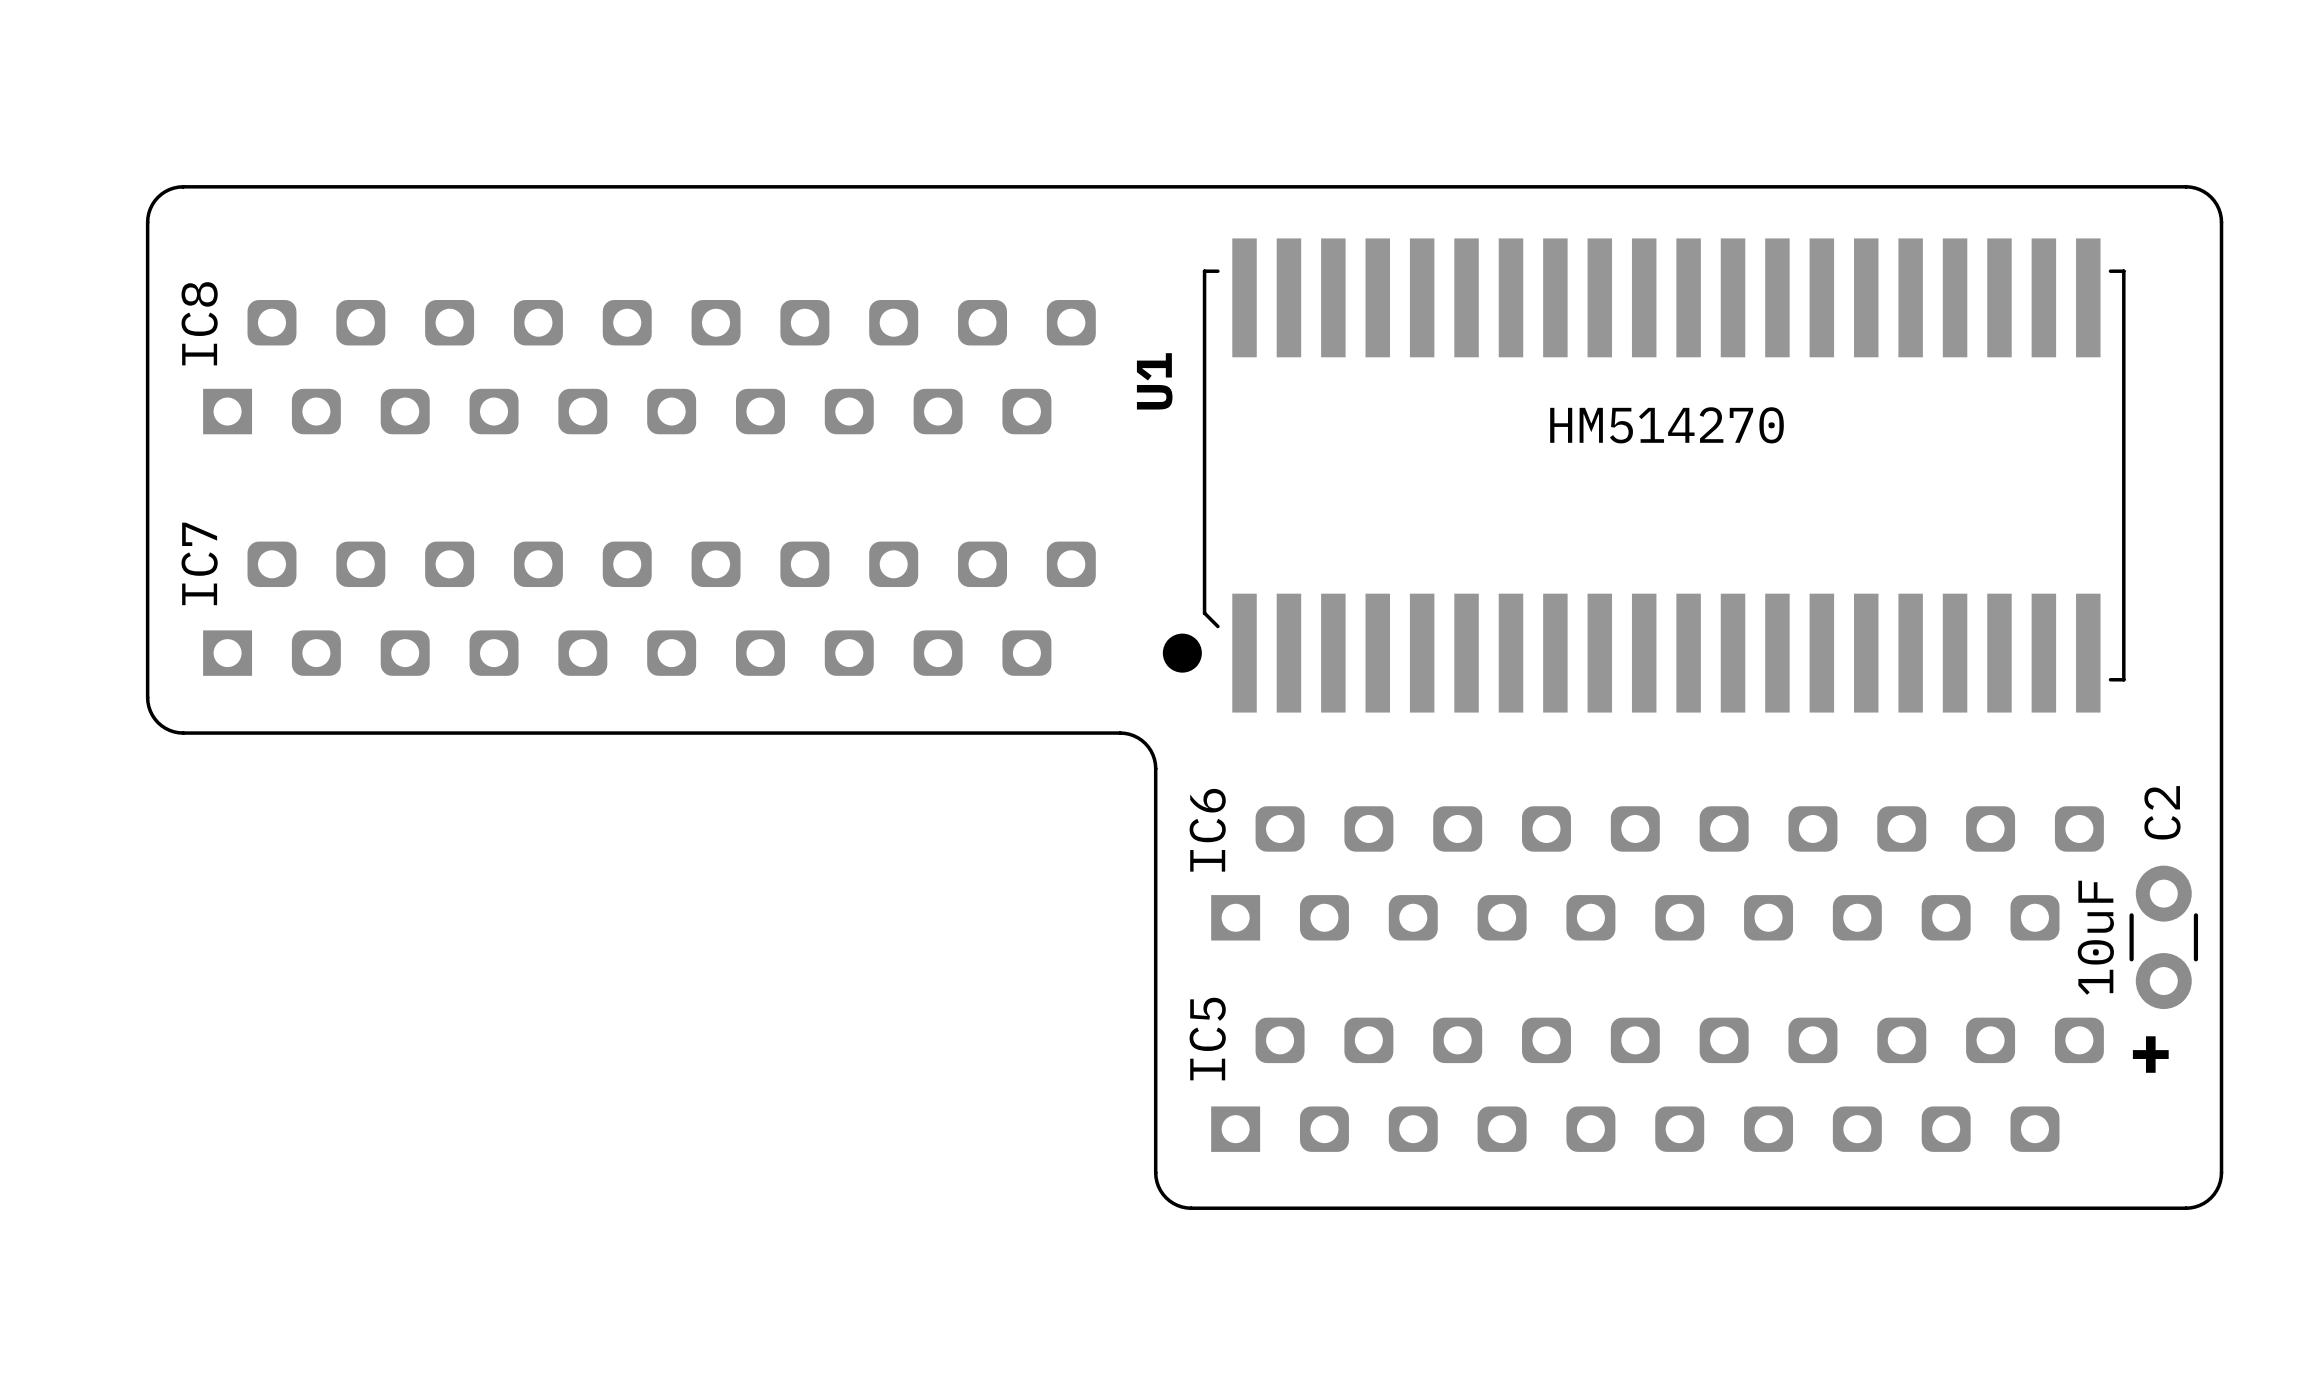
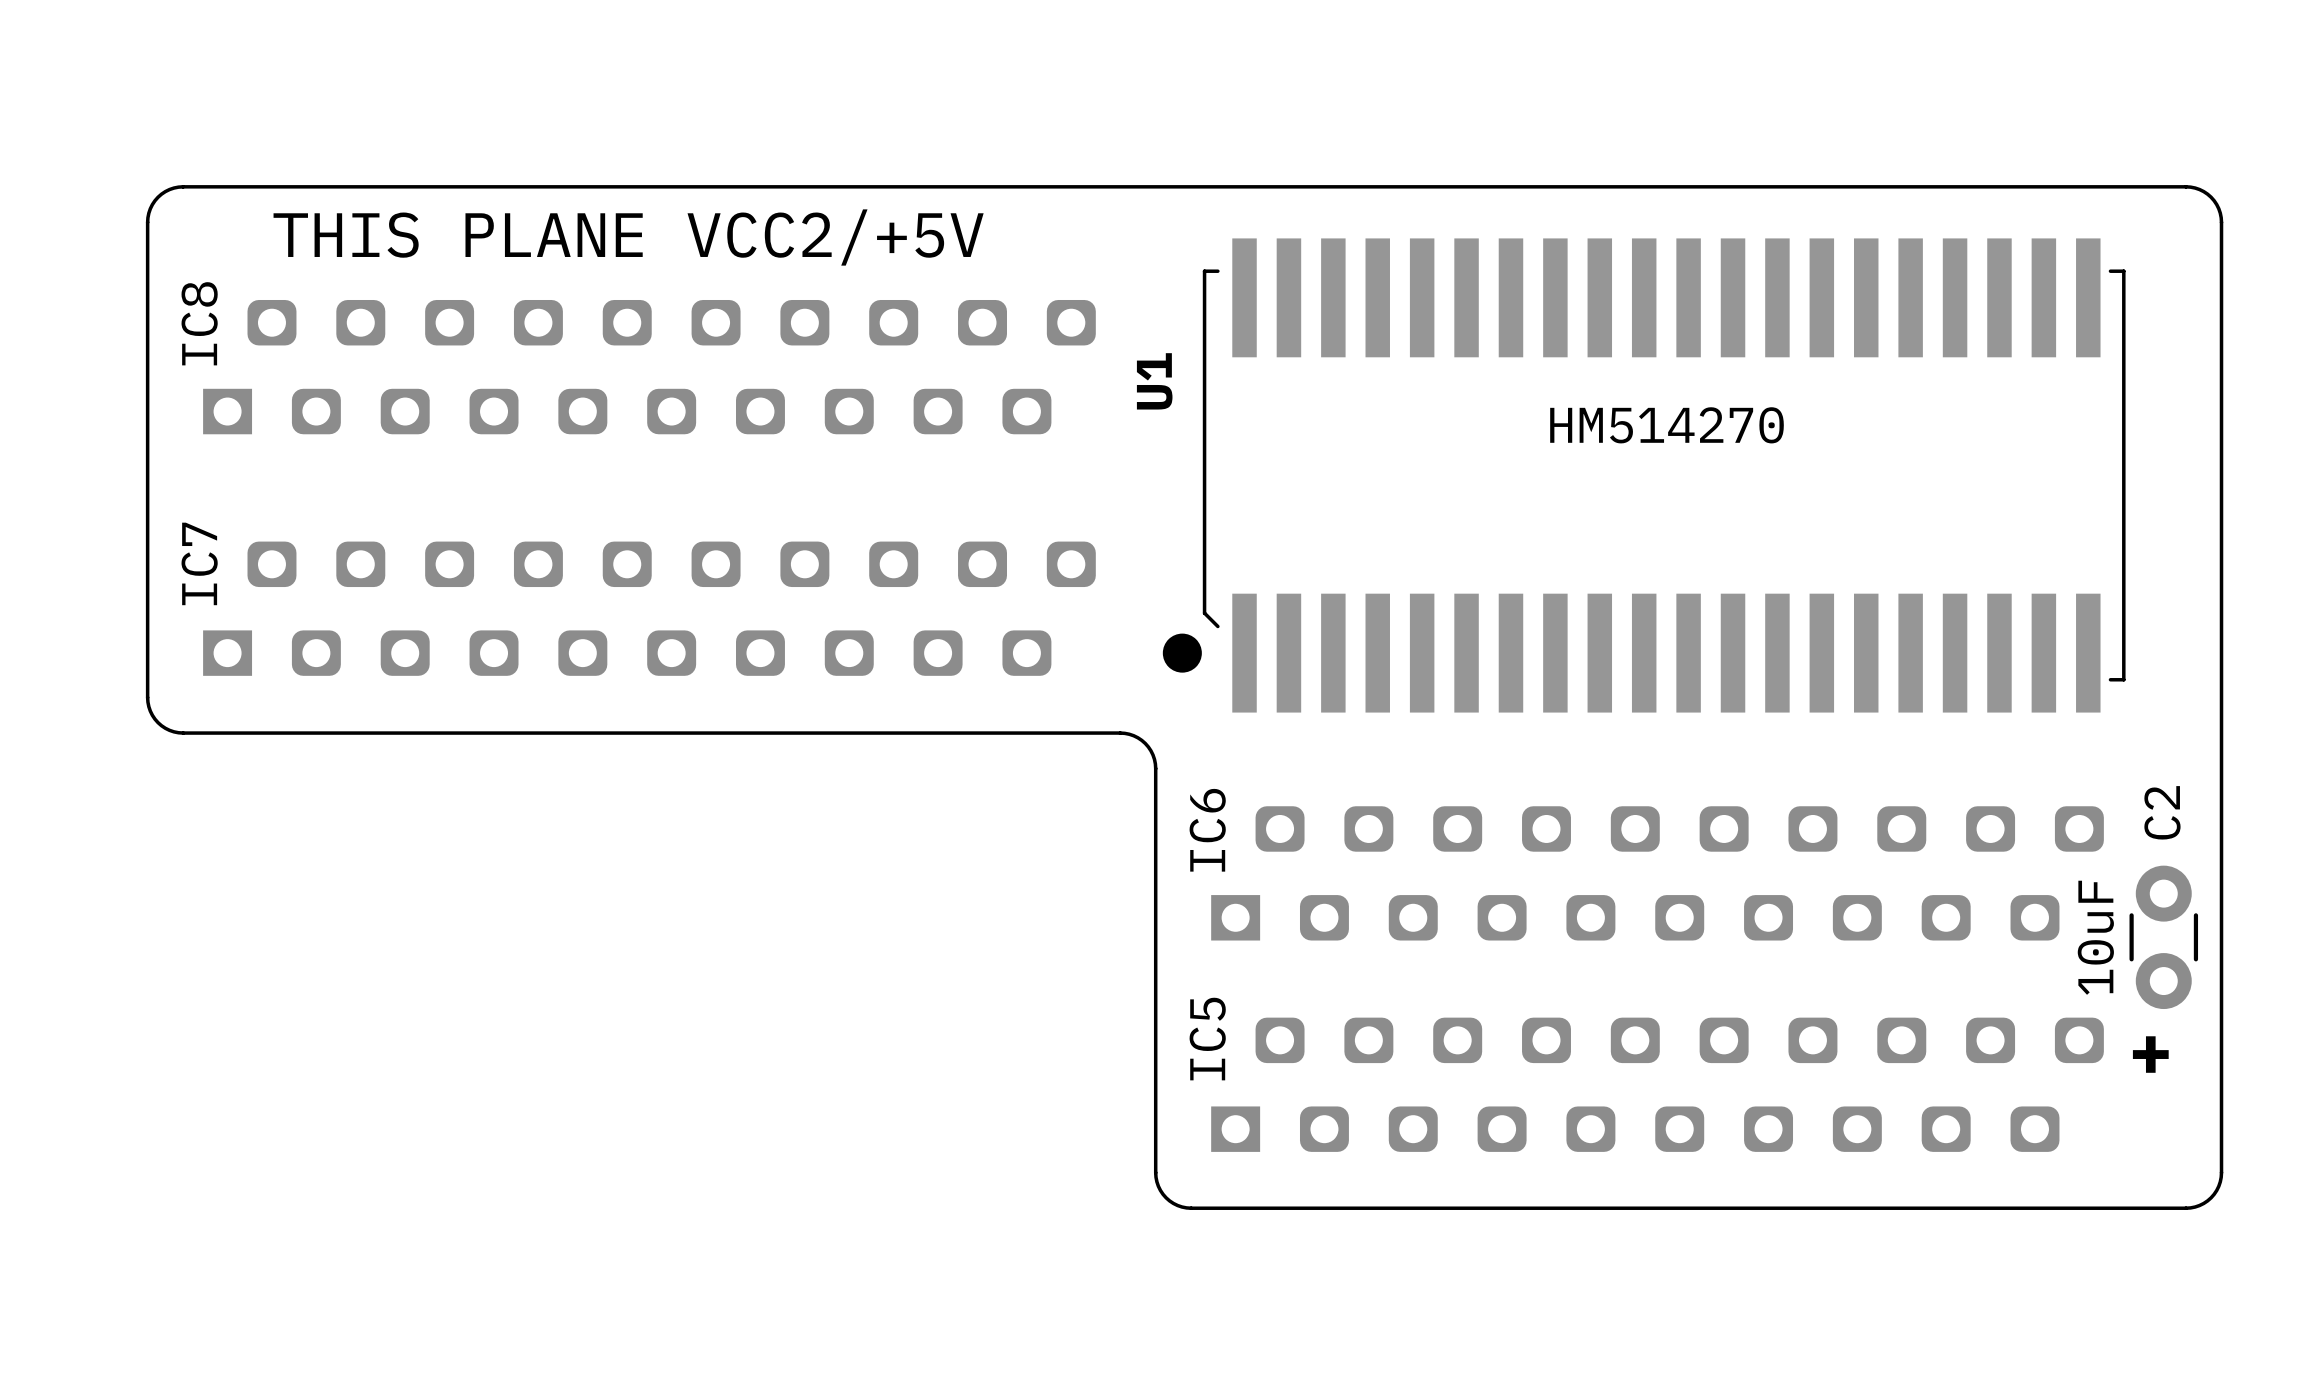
text: none -> THIS PLANE VCC2/+5V (628, 237)

